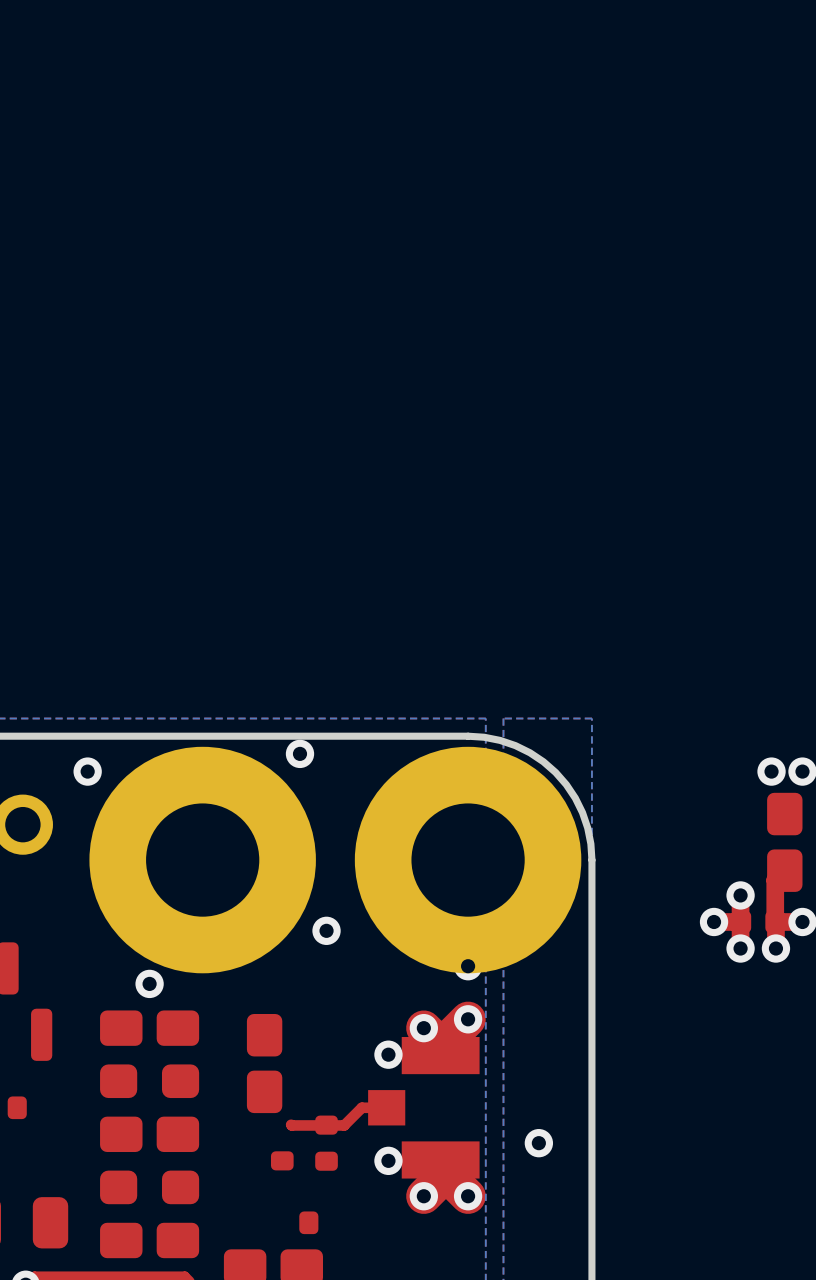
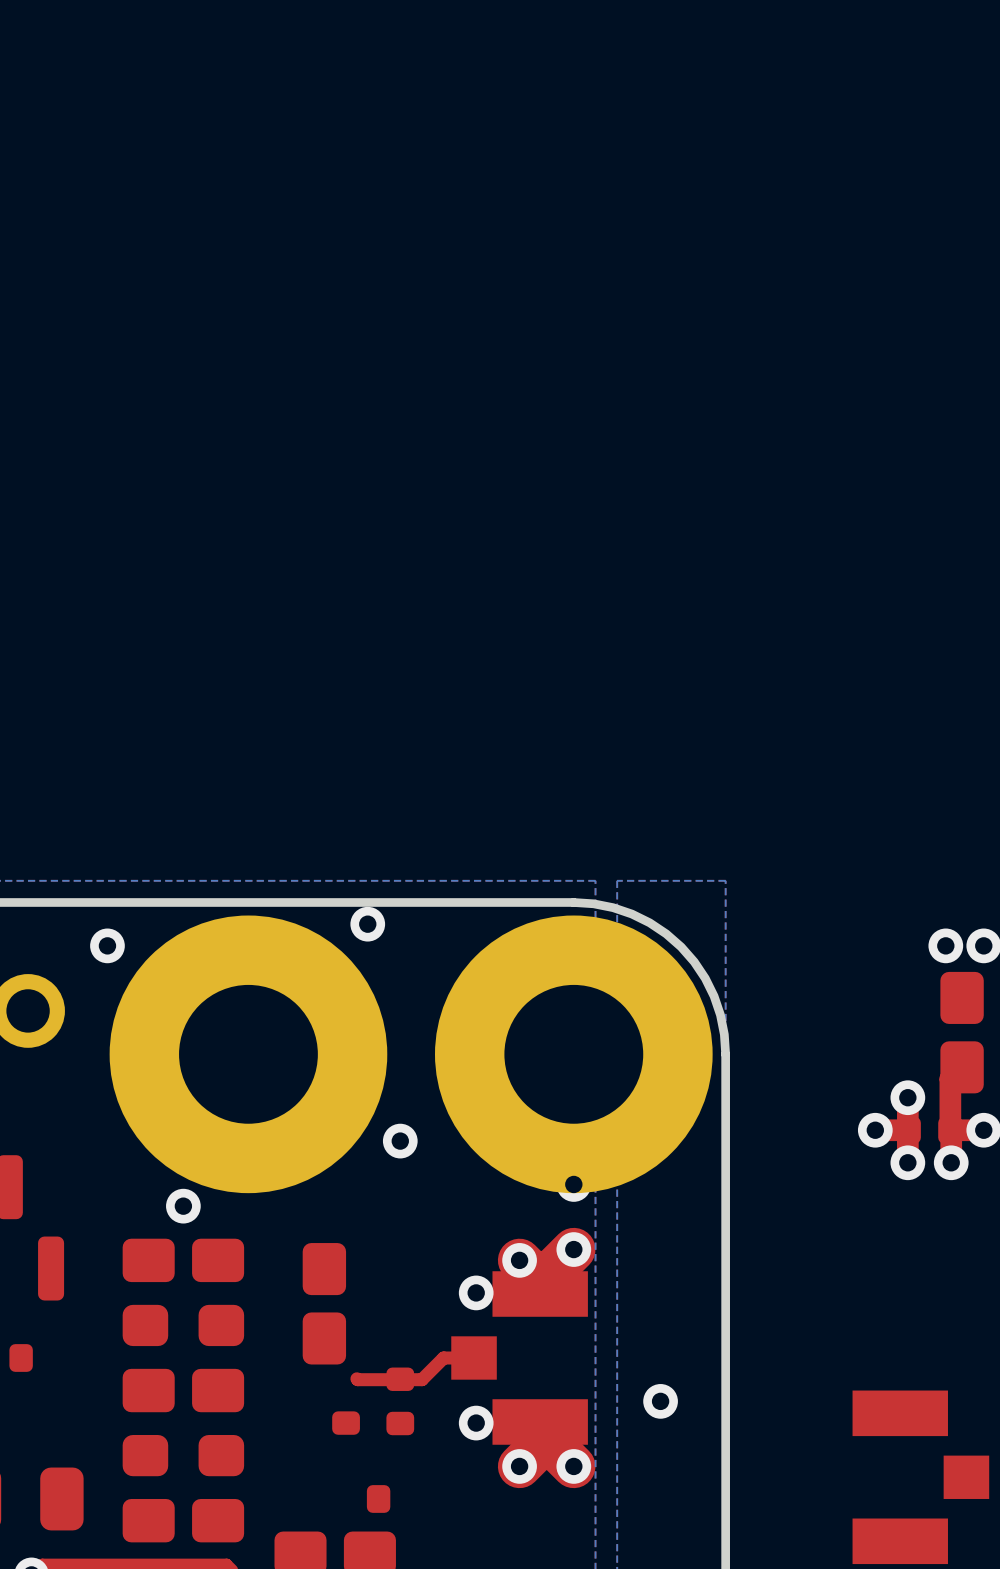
part: none -> (920, 1477)

